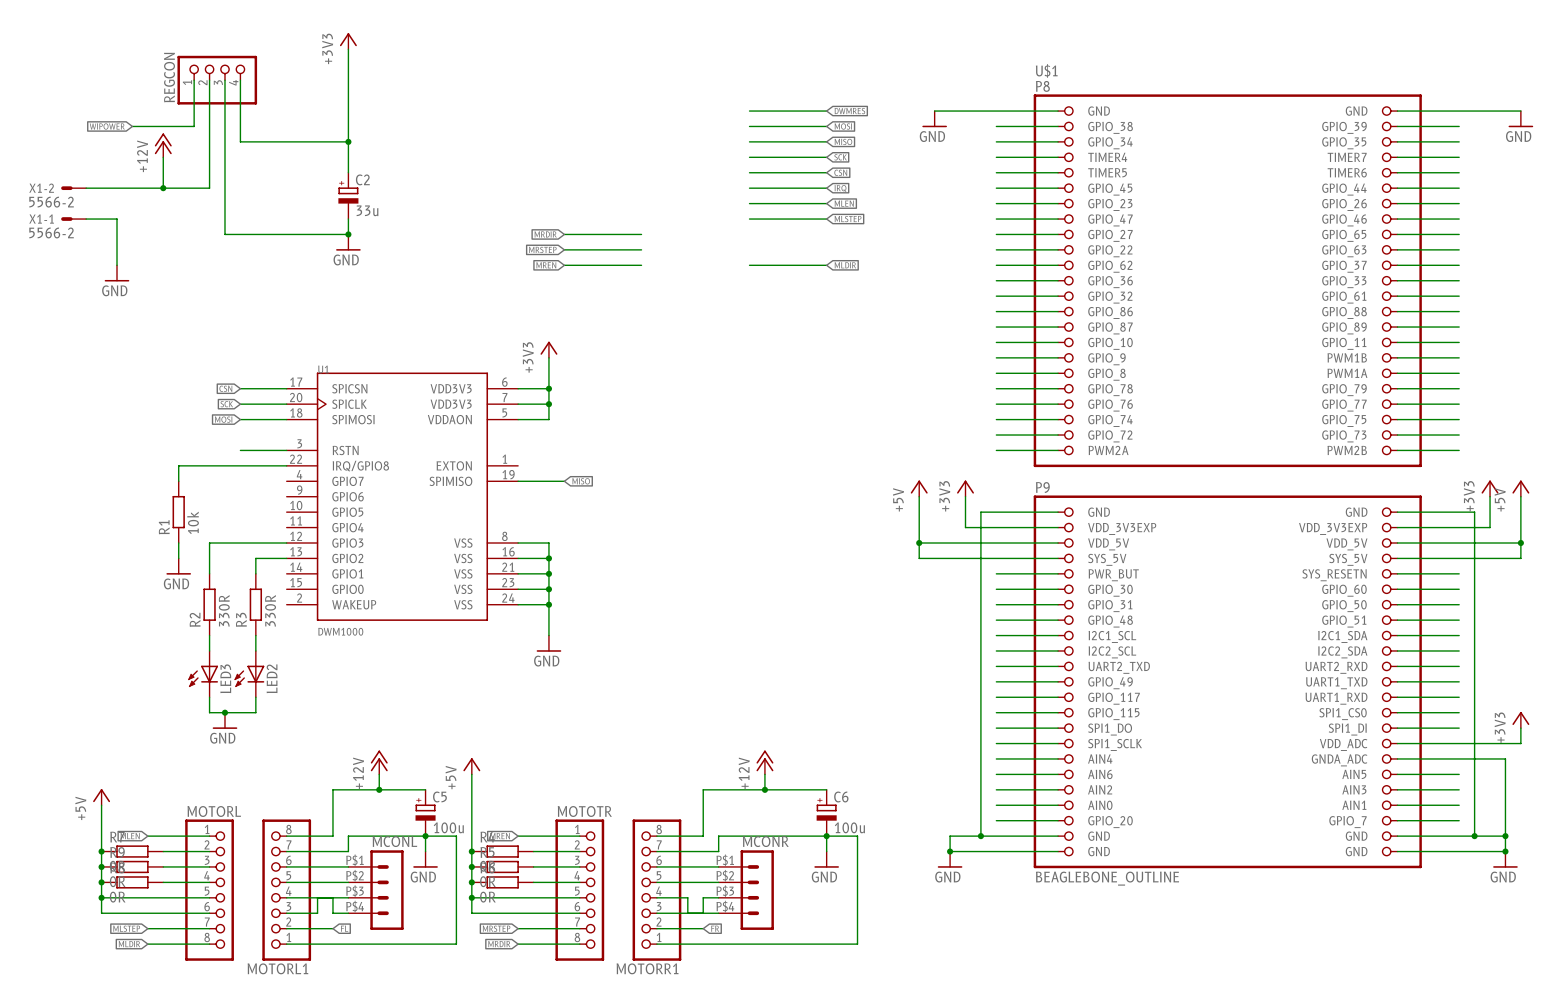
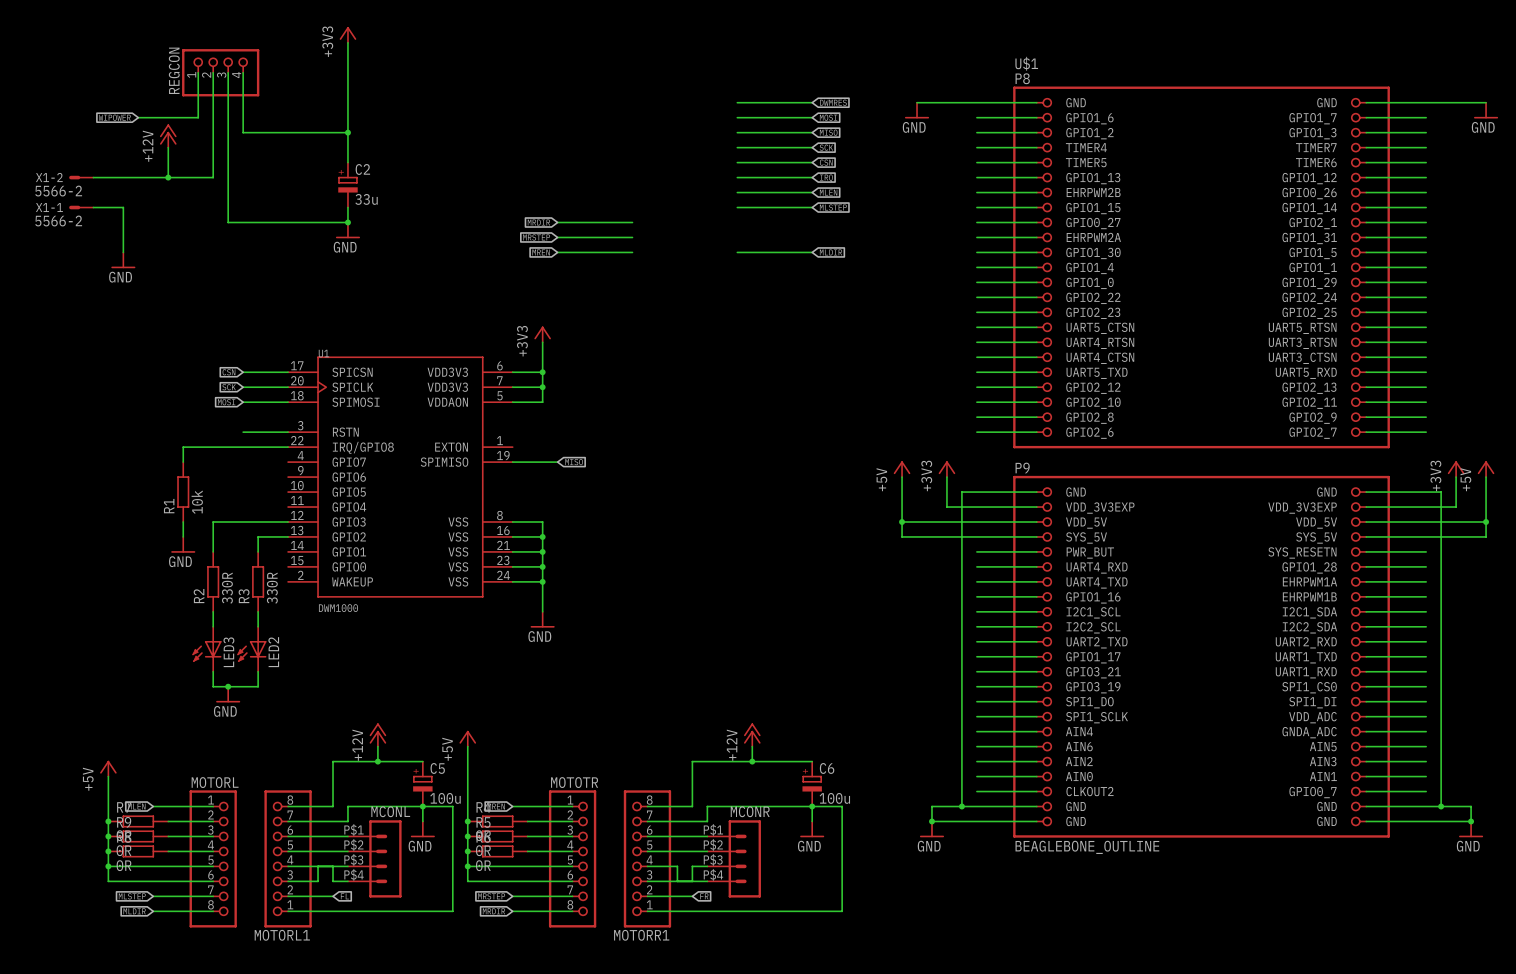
U$1 symbol: [1033, 94, 1422, 869] -> [1013, 86, 1390, 838]
power symbol: +3V3 (1520, 720) -> none
wire: (1520, 728) (1520, 743) (1459, 743) -> none
wire: (1459, 758) (1505, 758) (1505, 836) -> none
junction: (1505, 836) -> none

